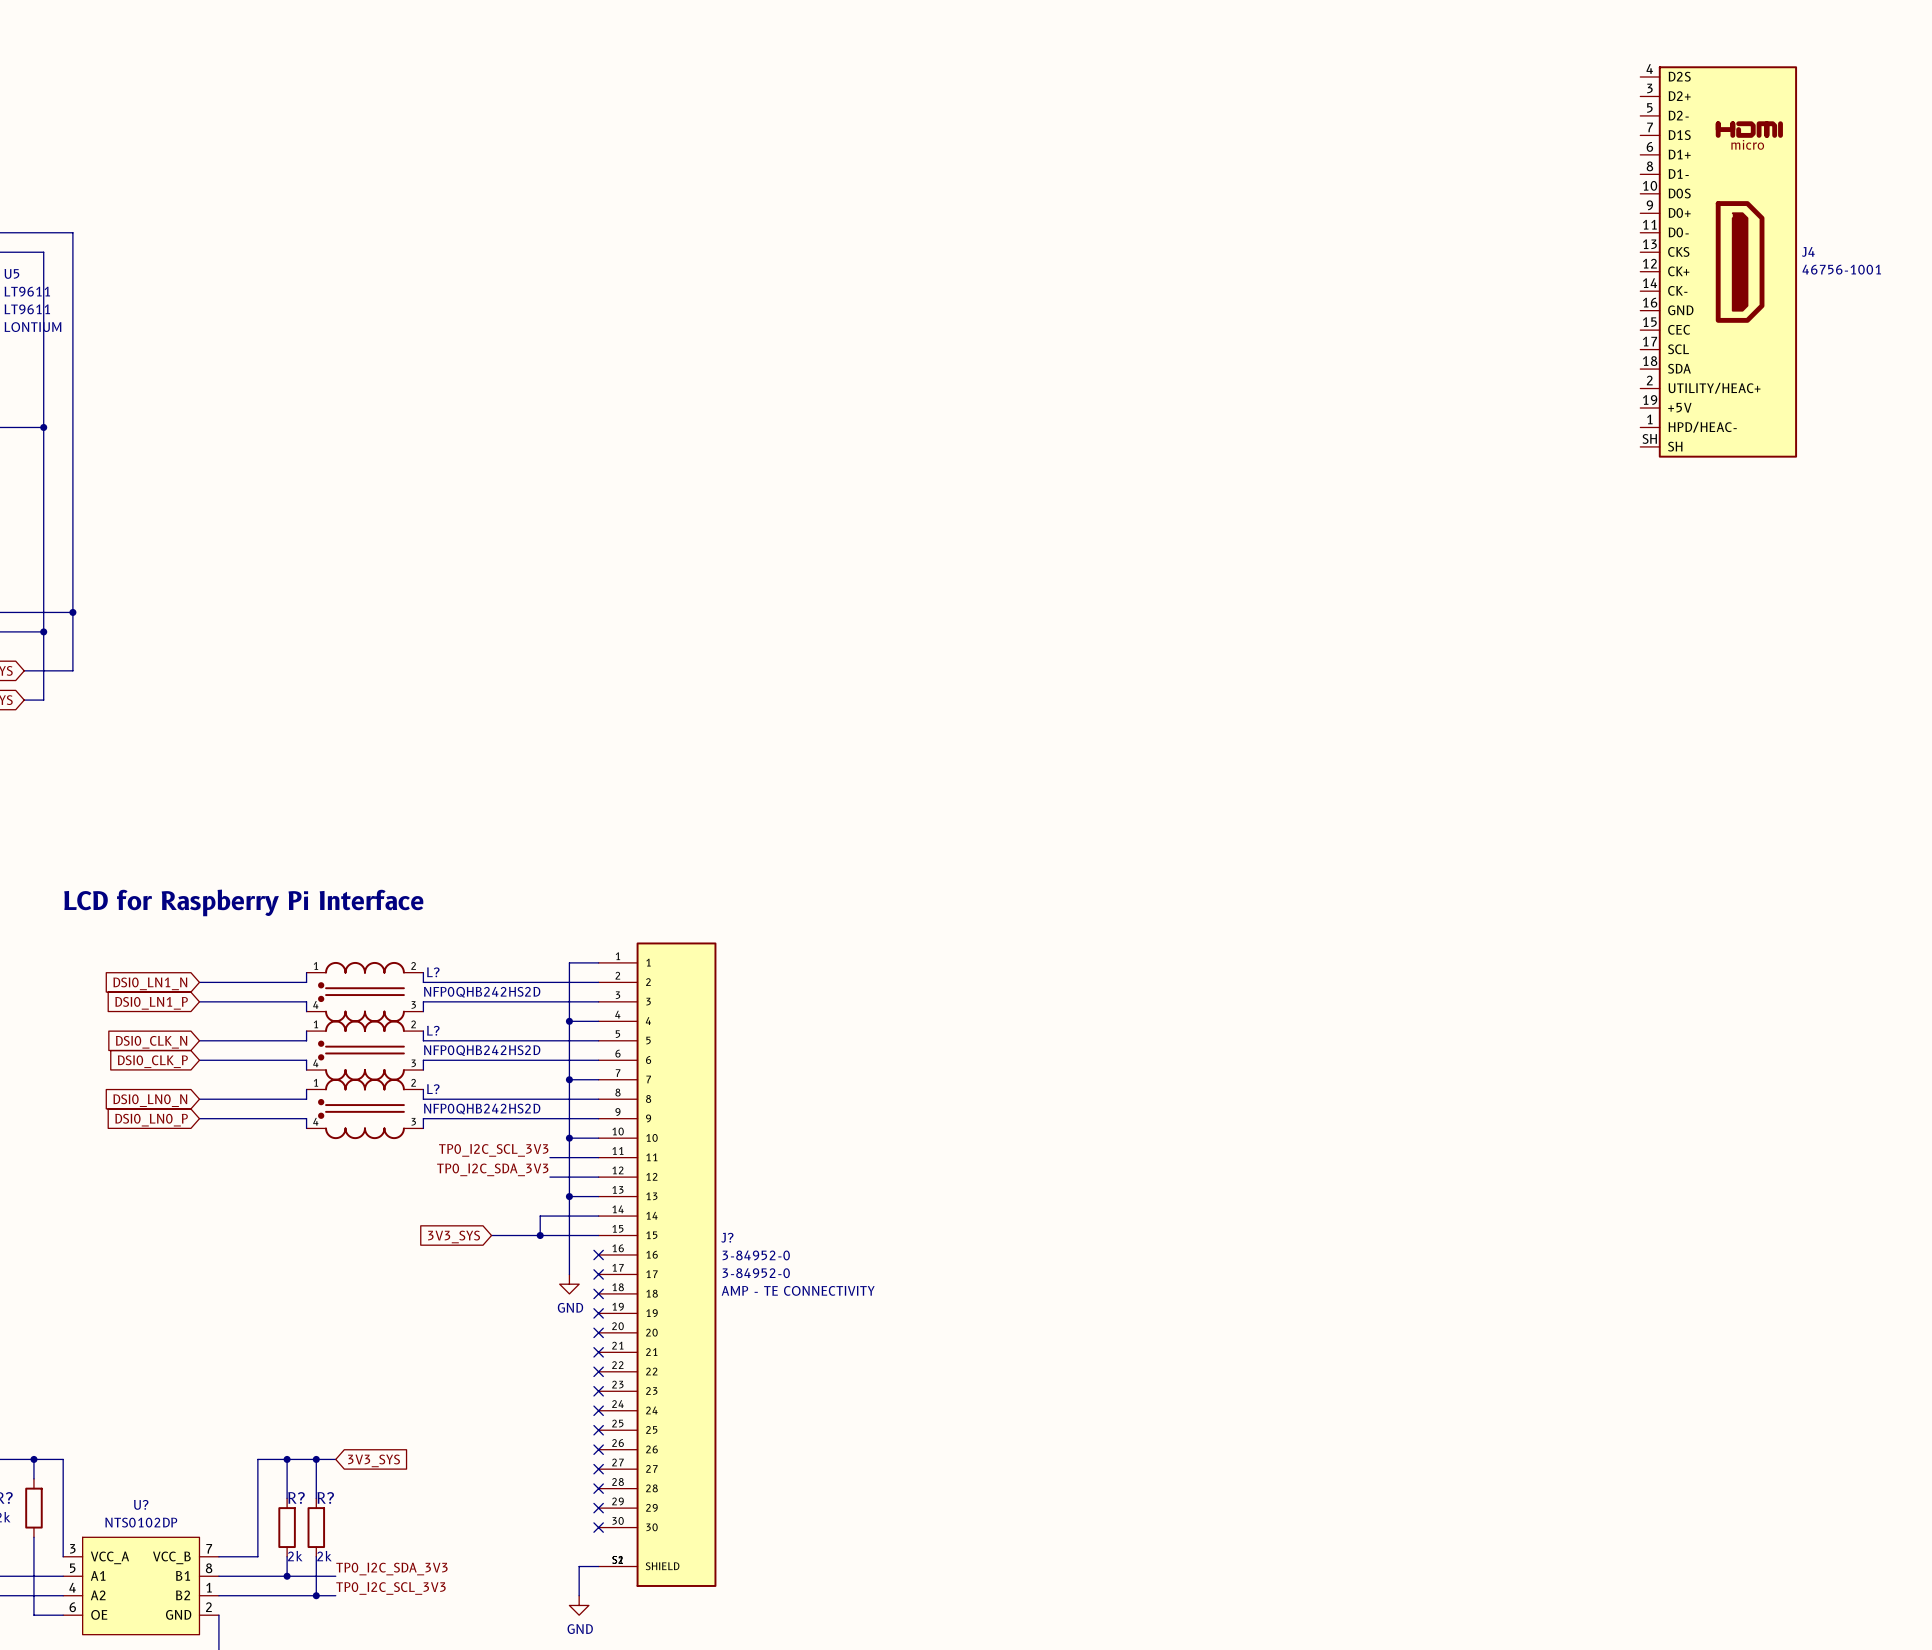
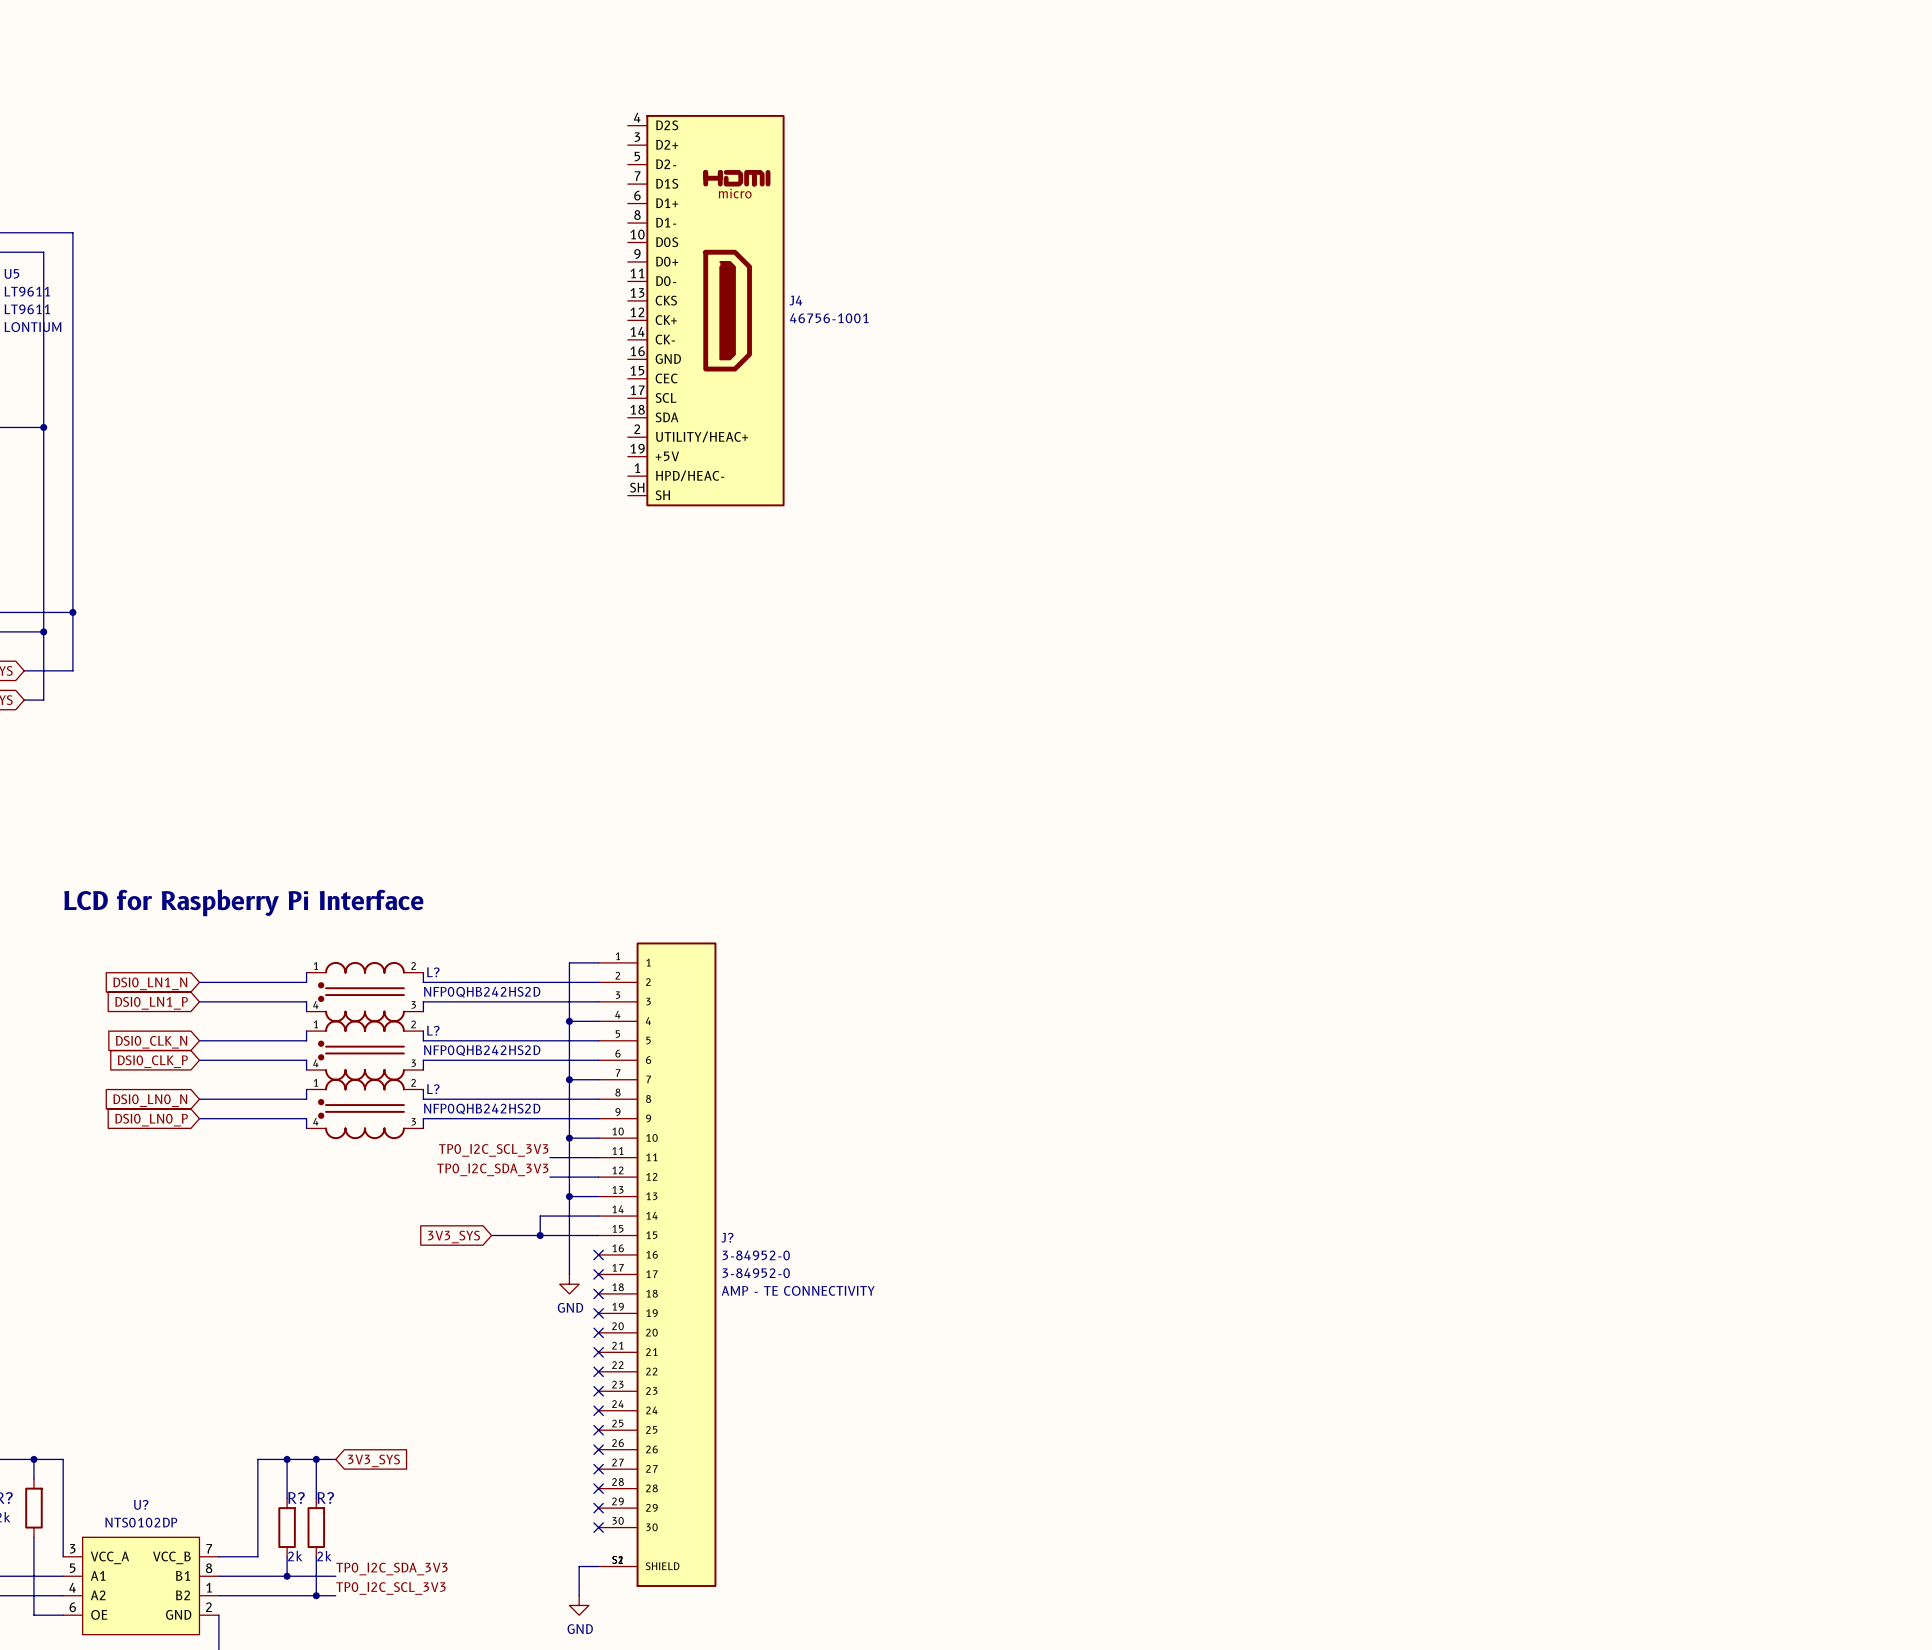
J4 position: (1718, 261) -> (706, 310)

